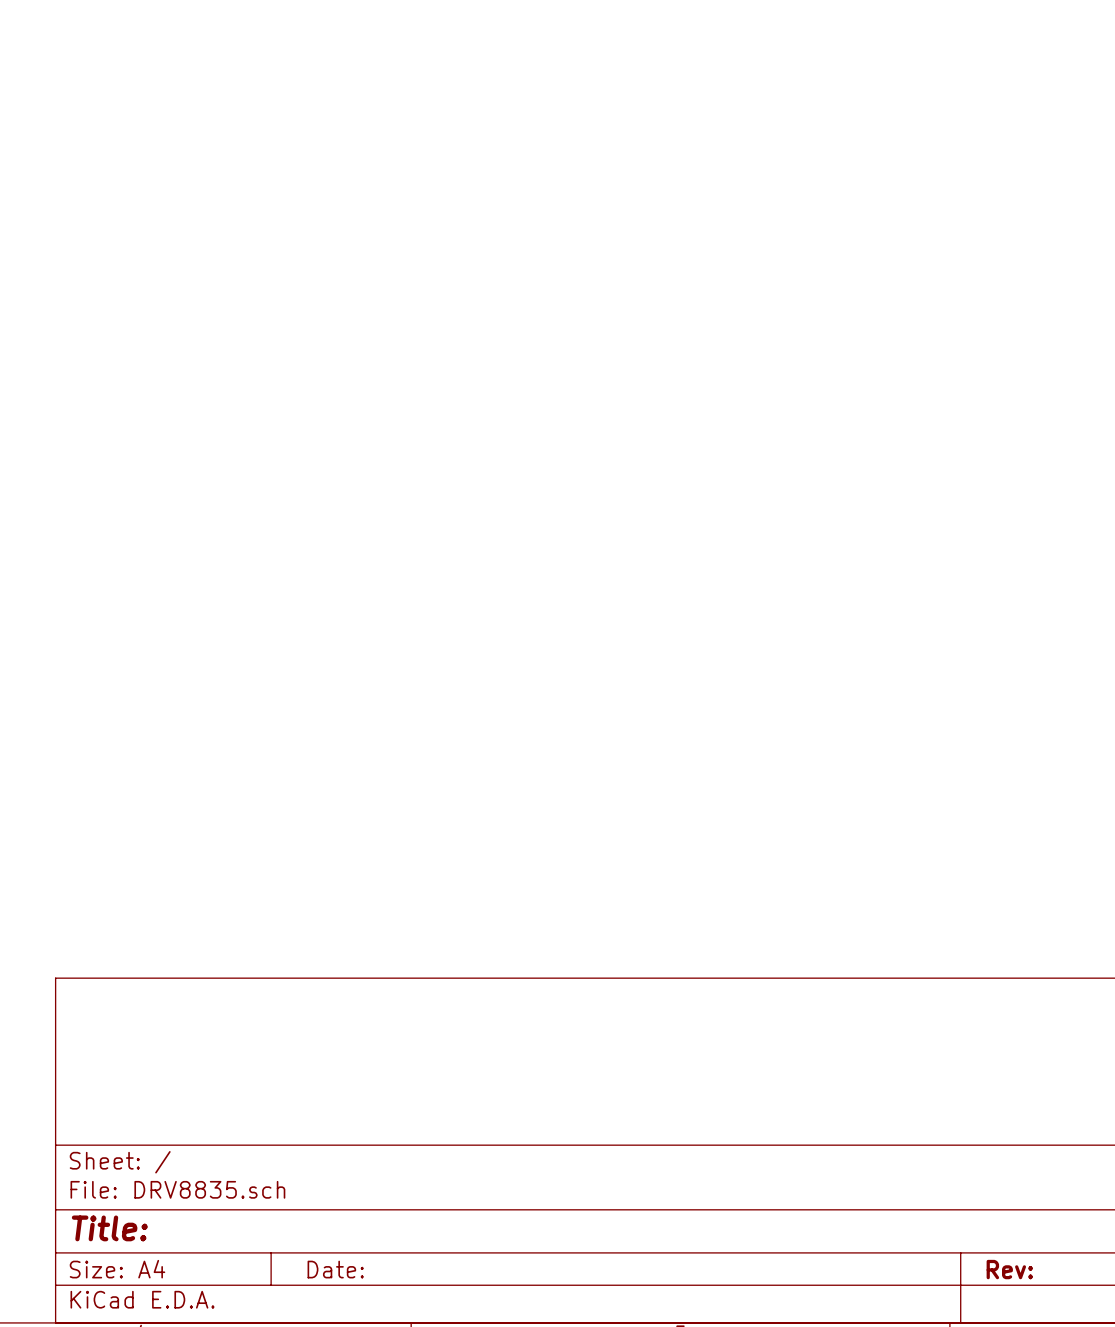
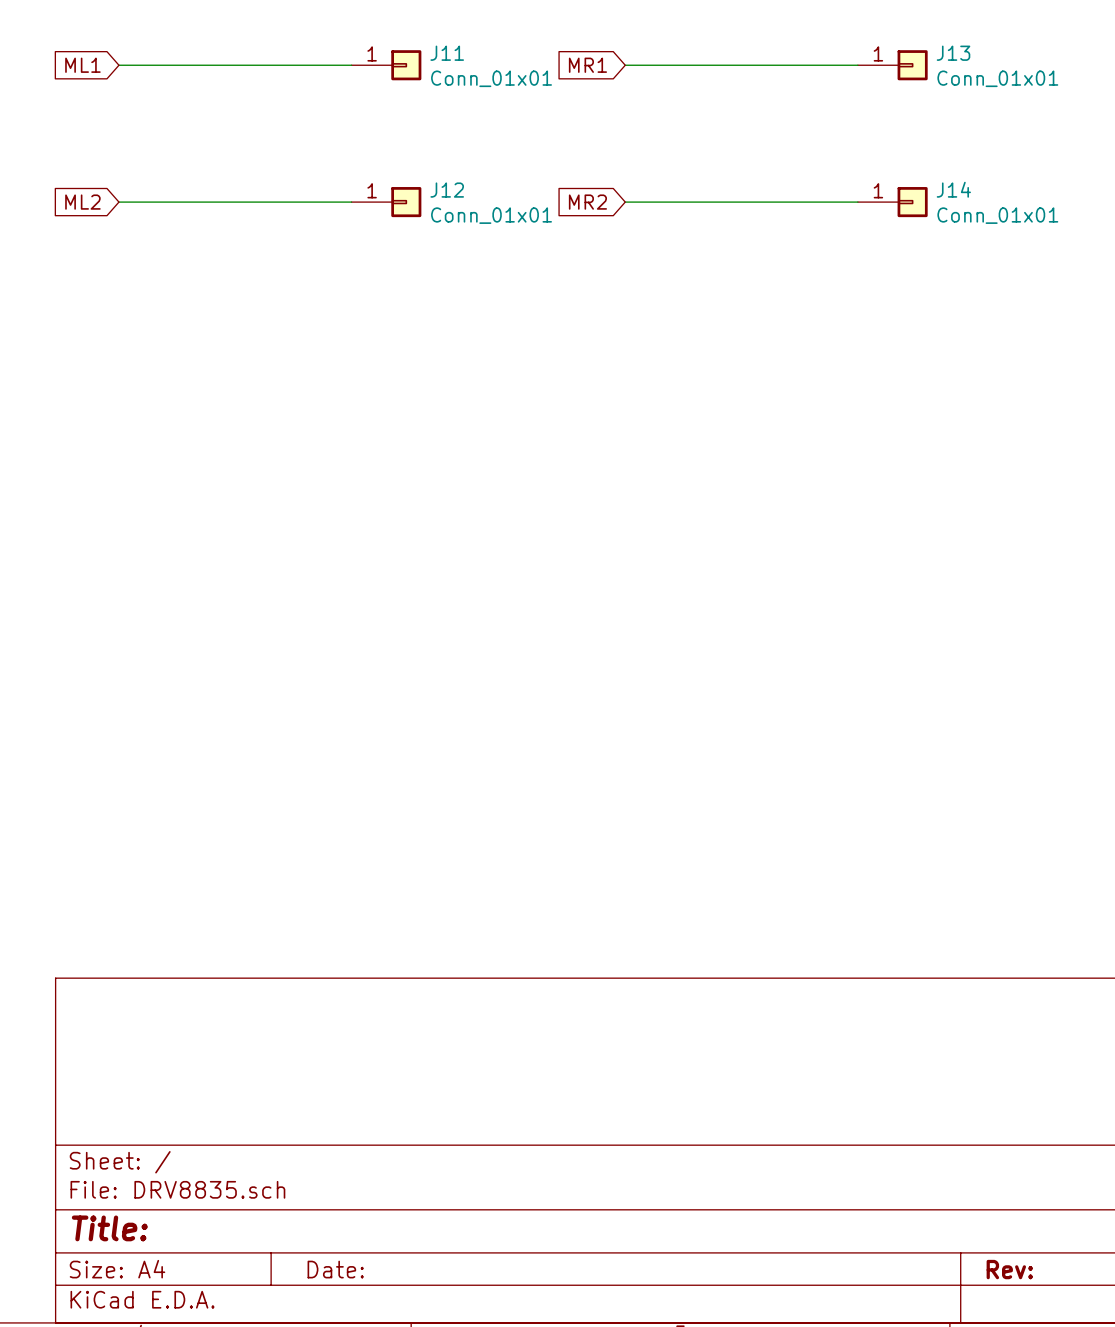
global label: none -> ML1 (82, 65)
wire: none -> (118, 65) (351, 65)
J11: none -> Conn_01x01 (386, 65)
global label: none -> MR1 (587, 65)
wire: none -> (625, 65) (857, 65)
J13: none -> Conn_01x01 (892, 65)
global label: none -> ML2 (82, 202)
wire: none -> (118, 202) (351, 202)
J12: none -> Conn_01x01 (386, 202)
global label: none -> MR2 (587, 202)
wire: none -> (625, 202) (857, 202)
J14: none -> Conn_01x01 (892, 202)

